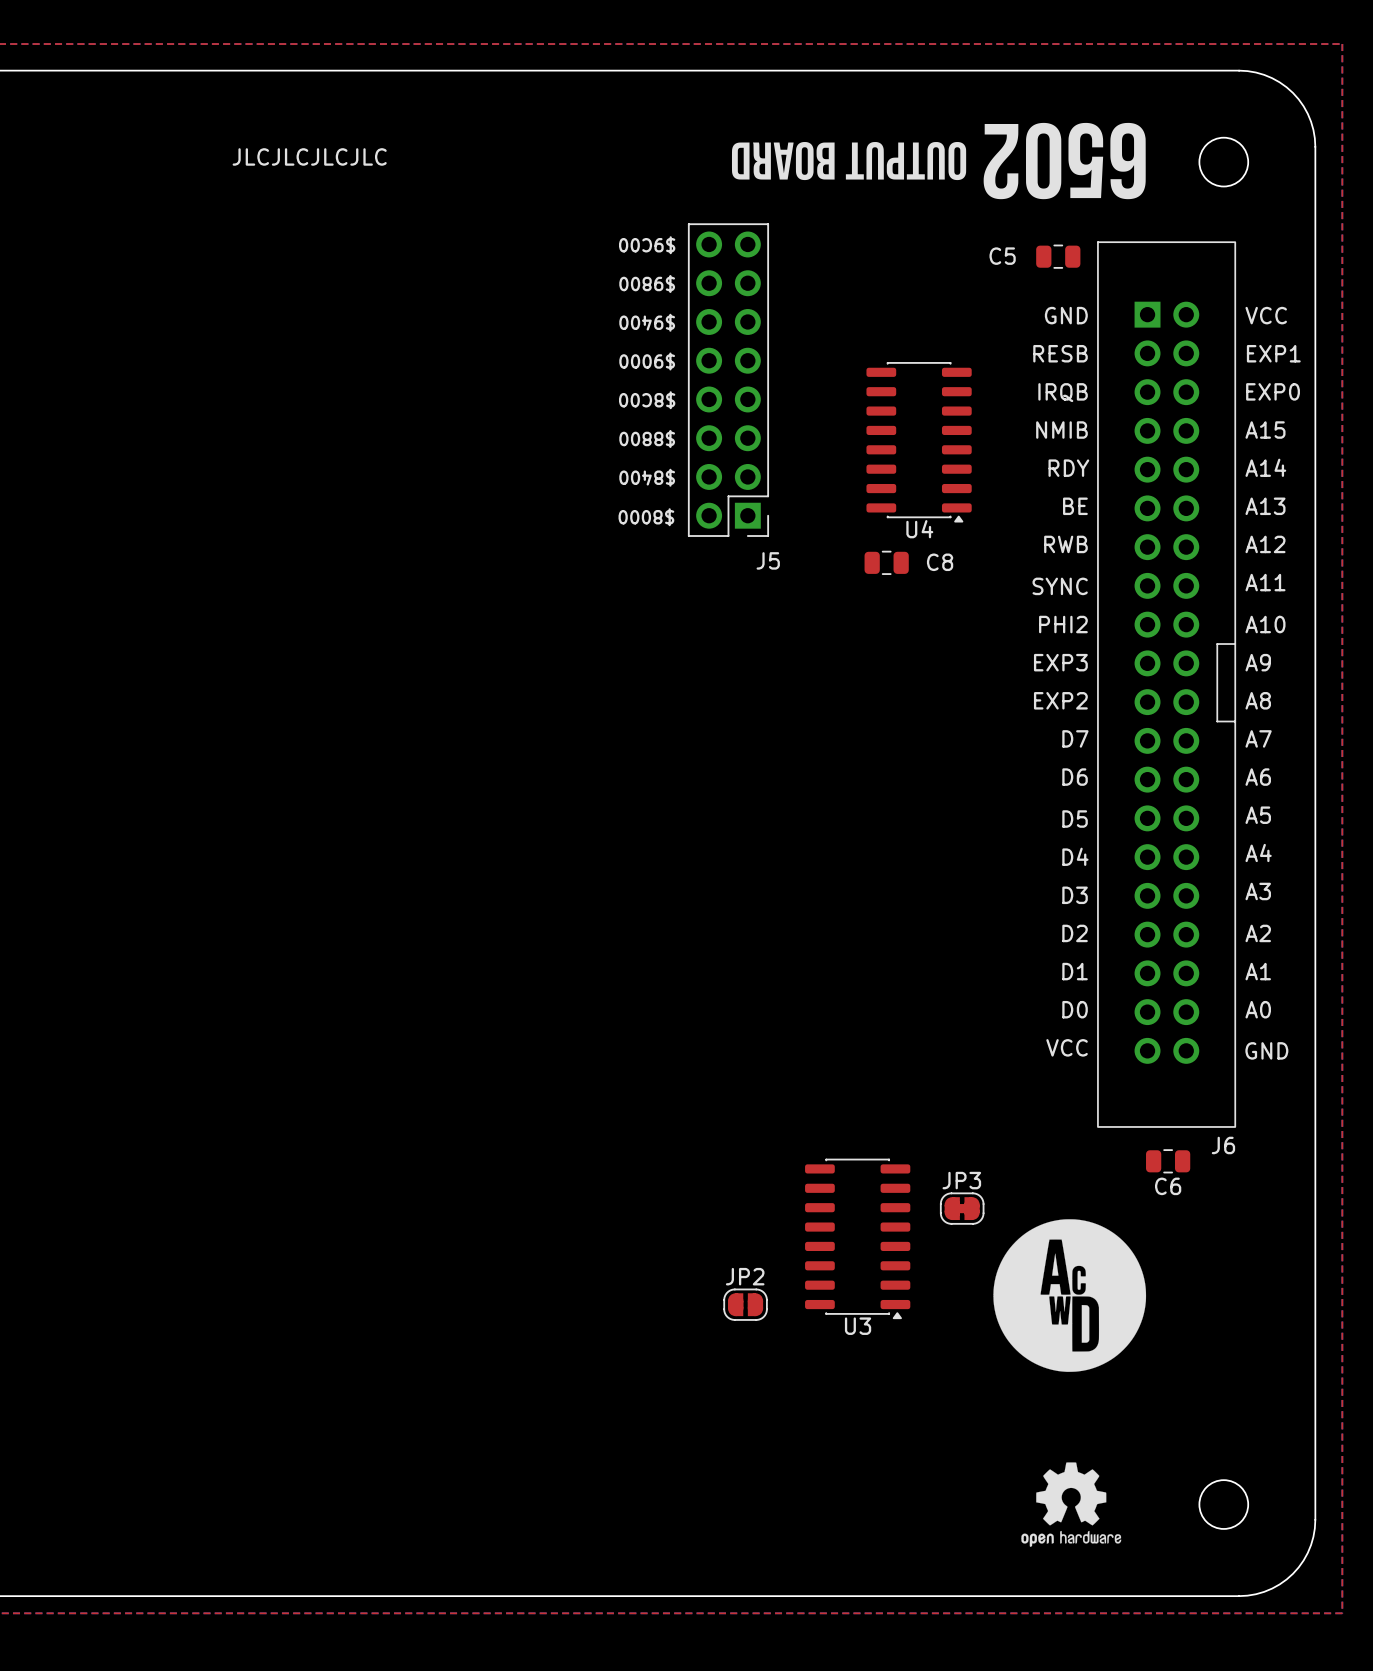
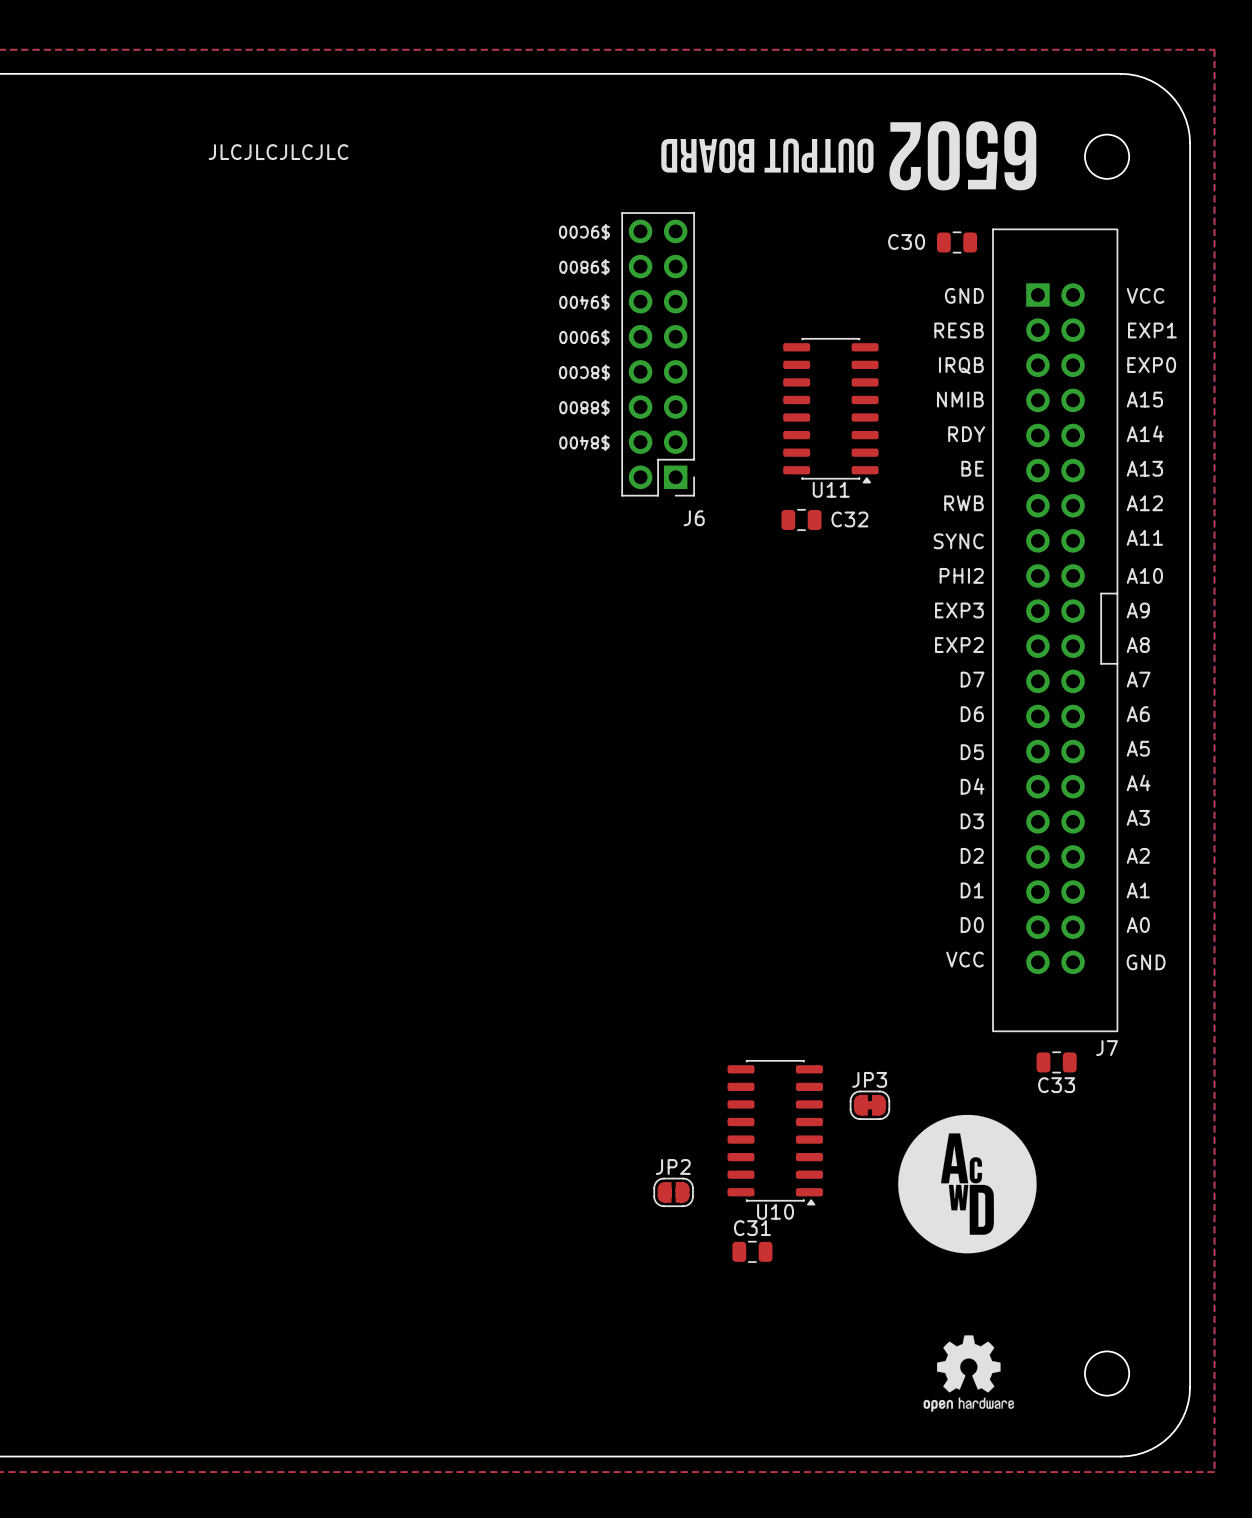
C5 name: C5 (1002, 256) -> C30 (906, 241)
text: $8000 (646, 517) -> none
U4 name: U4 (919, 529) -> U11 (831, 489)
J5 name: J5 (768, 560) -> J6 (694, 518)
C8 name: C8 (940, 562) -> C32 (849, 519)
J6 name: J6 (1223, 1145) -> J7 (1107, 1048)
C6 name: C6 (1168, 1186) -> C33 (1056, 1085)
U3 name: U3 (858, 1326) -> U10 (775, 1211)
C31: none -> (752, 1251)

